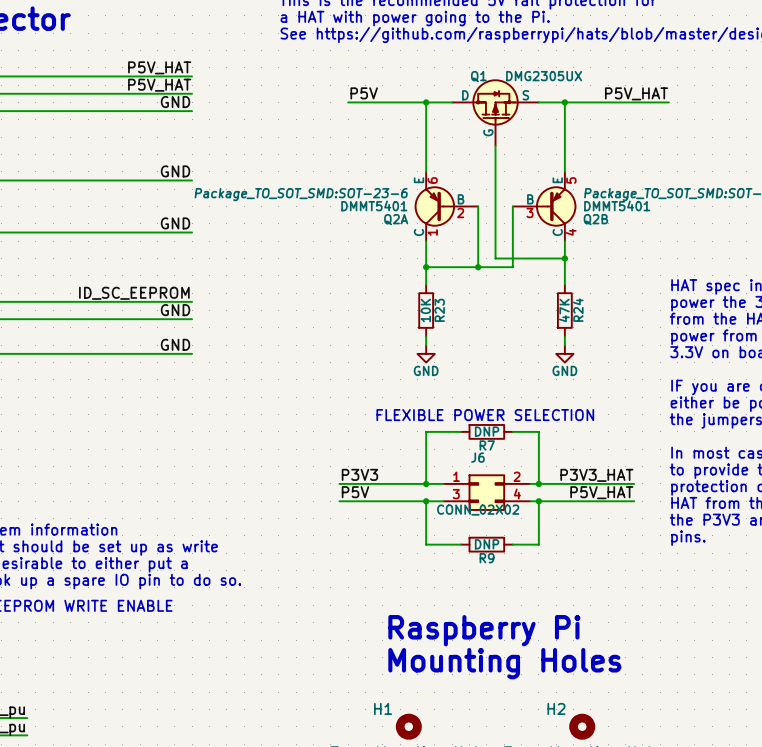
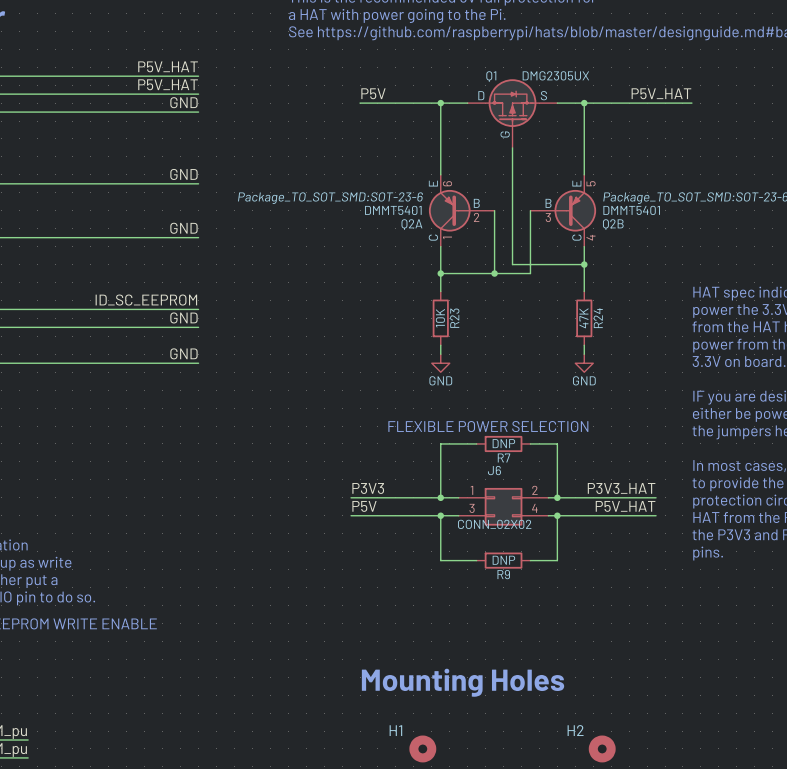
text: Raspberry Pi (484, 630) -> none
text position: Mounting Holes (504, 663) -> Mounting Holes (463, 682)

